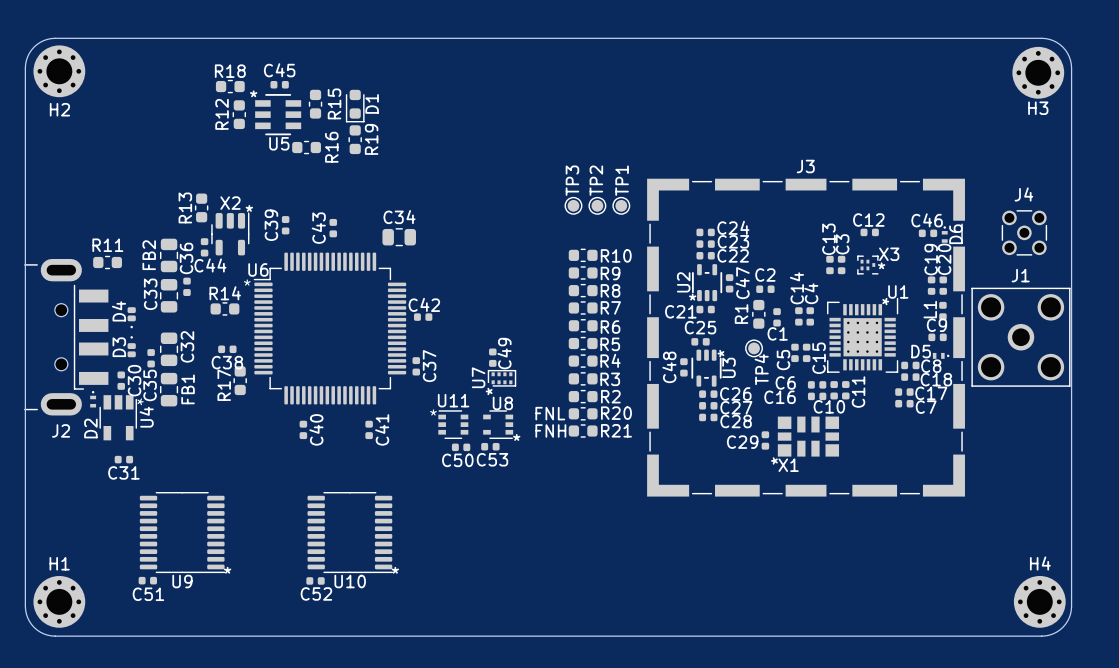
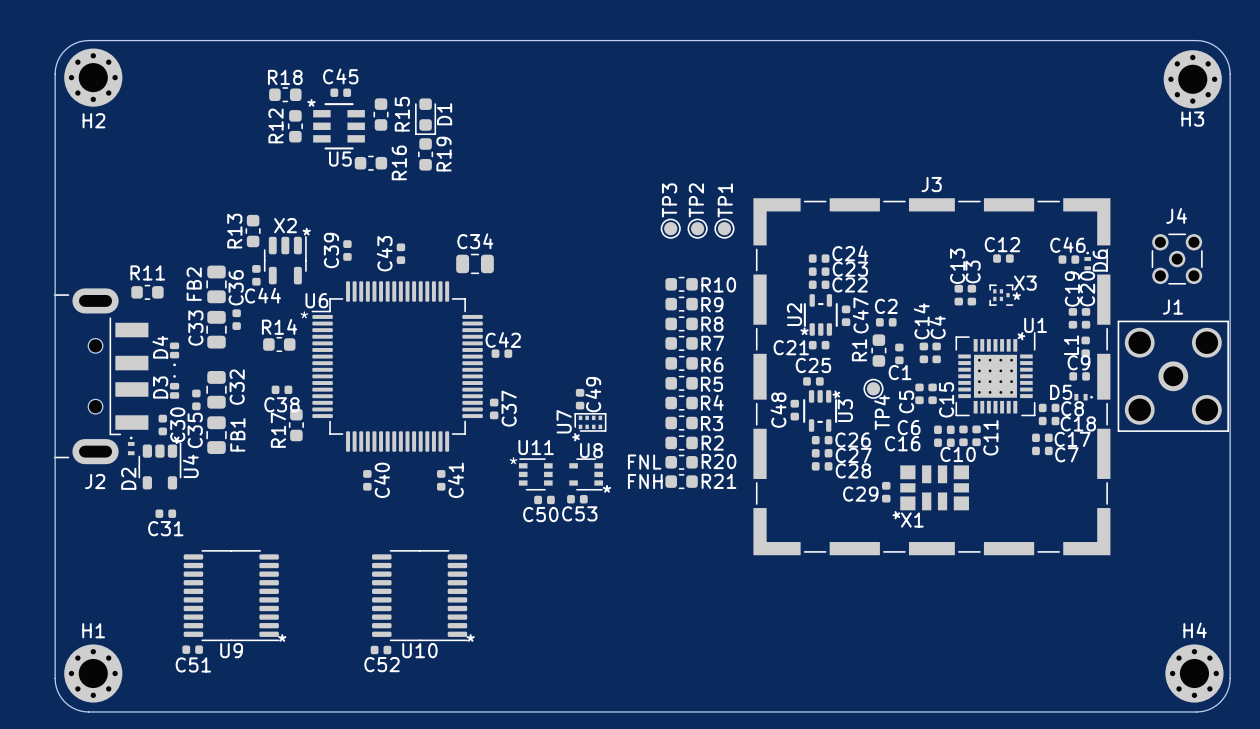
U4 footprint: [99, 395, 138, 441] -> [138, 442, 182, 490]

